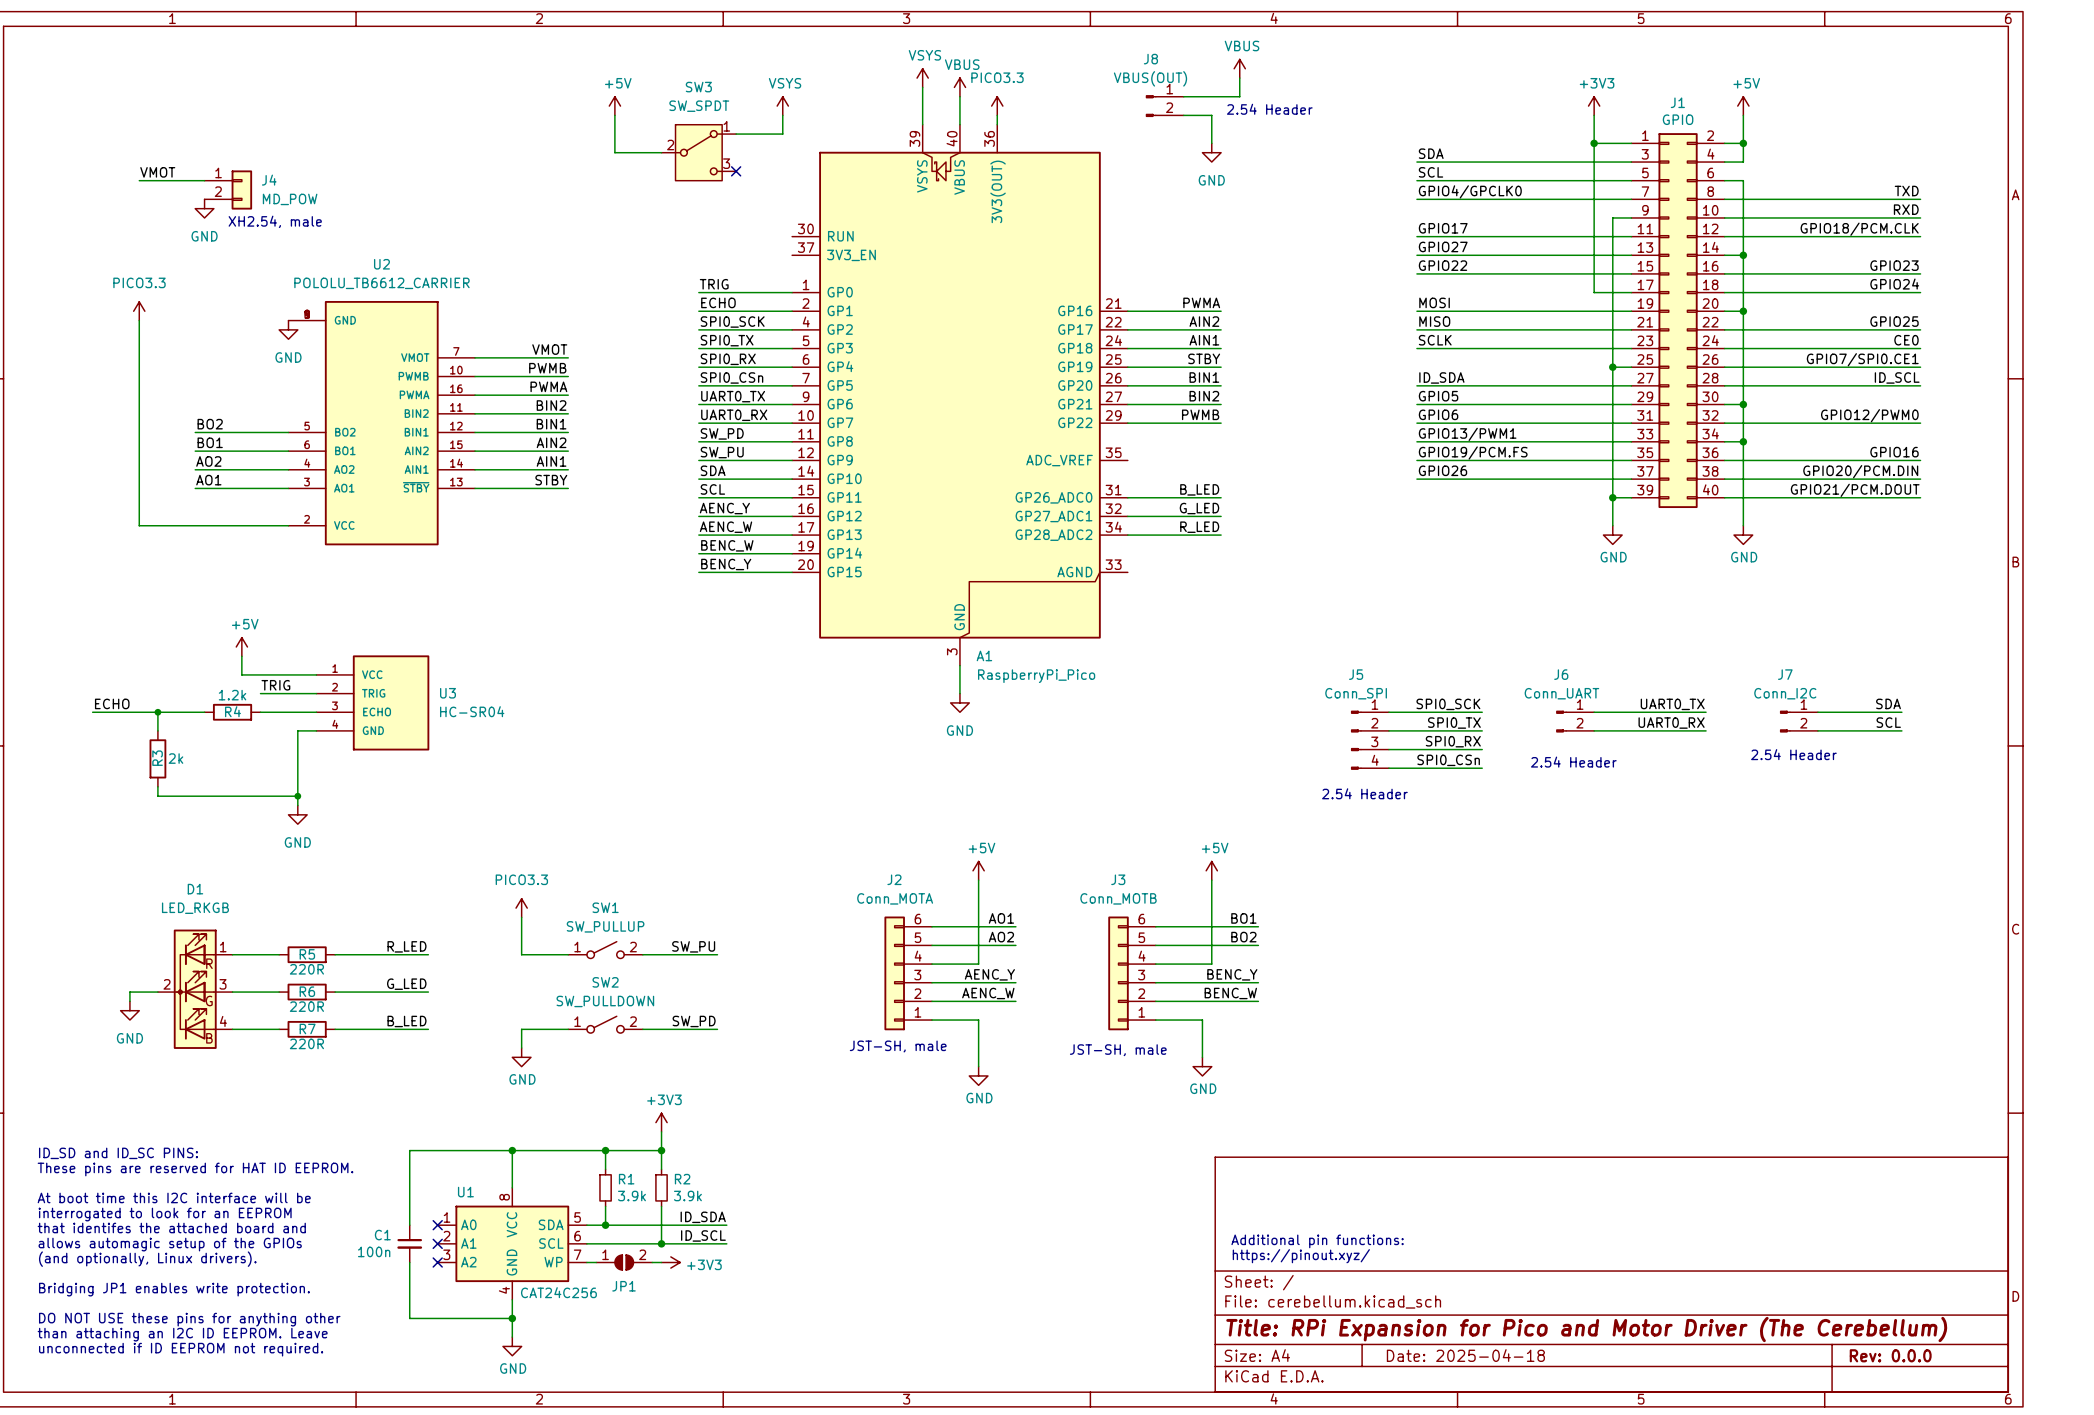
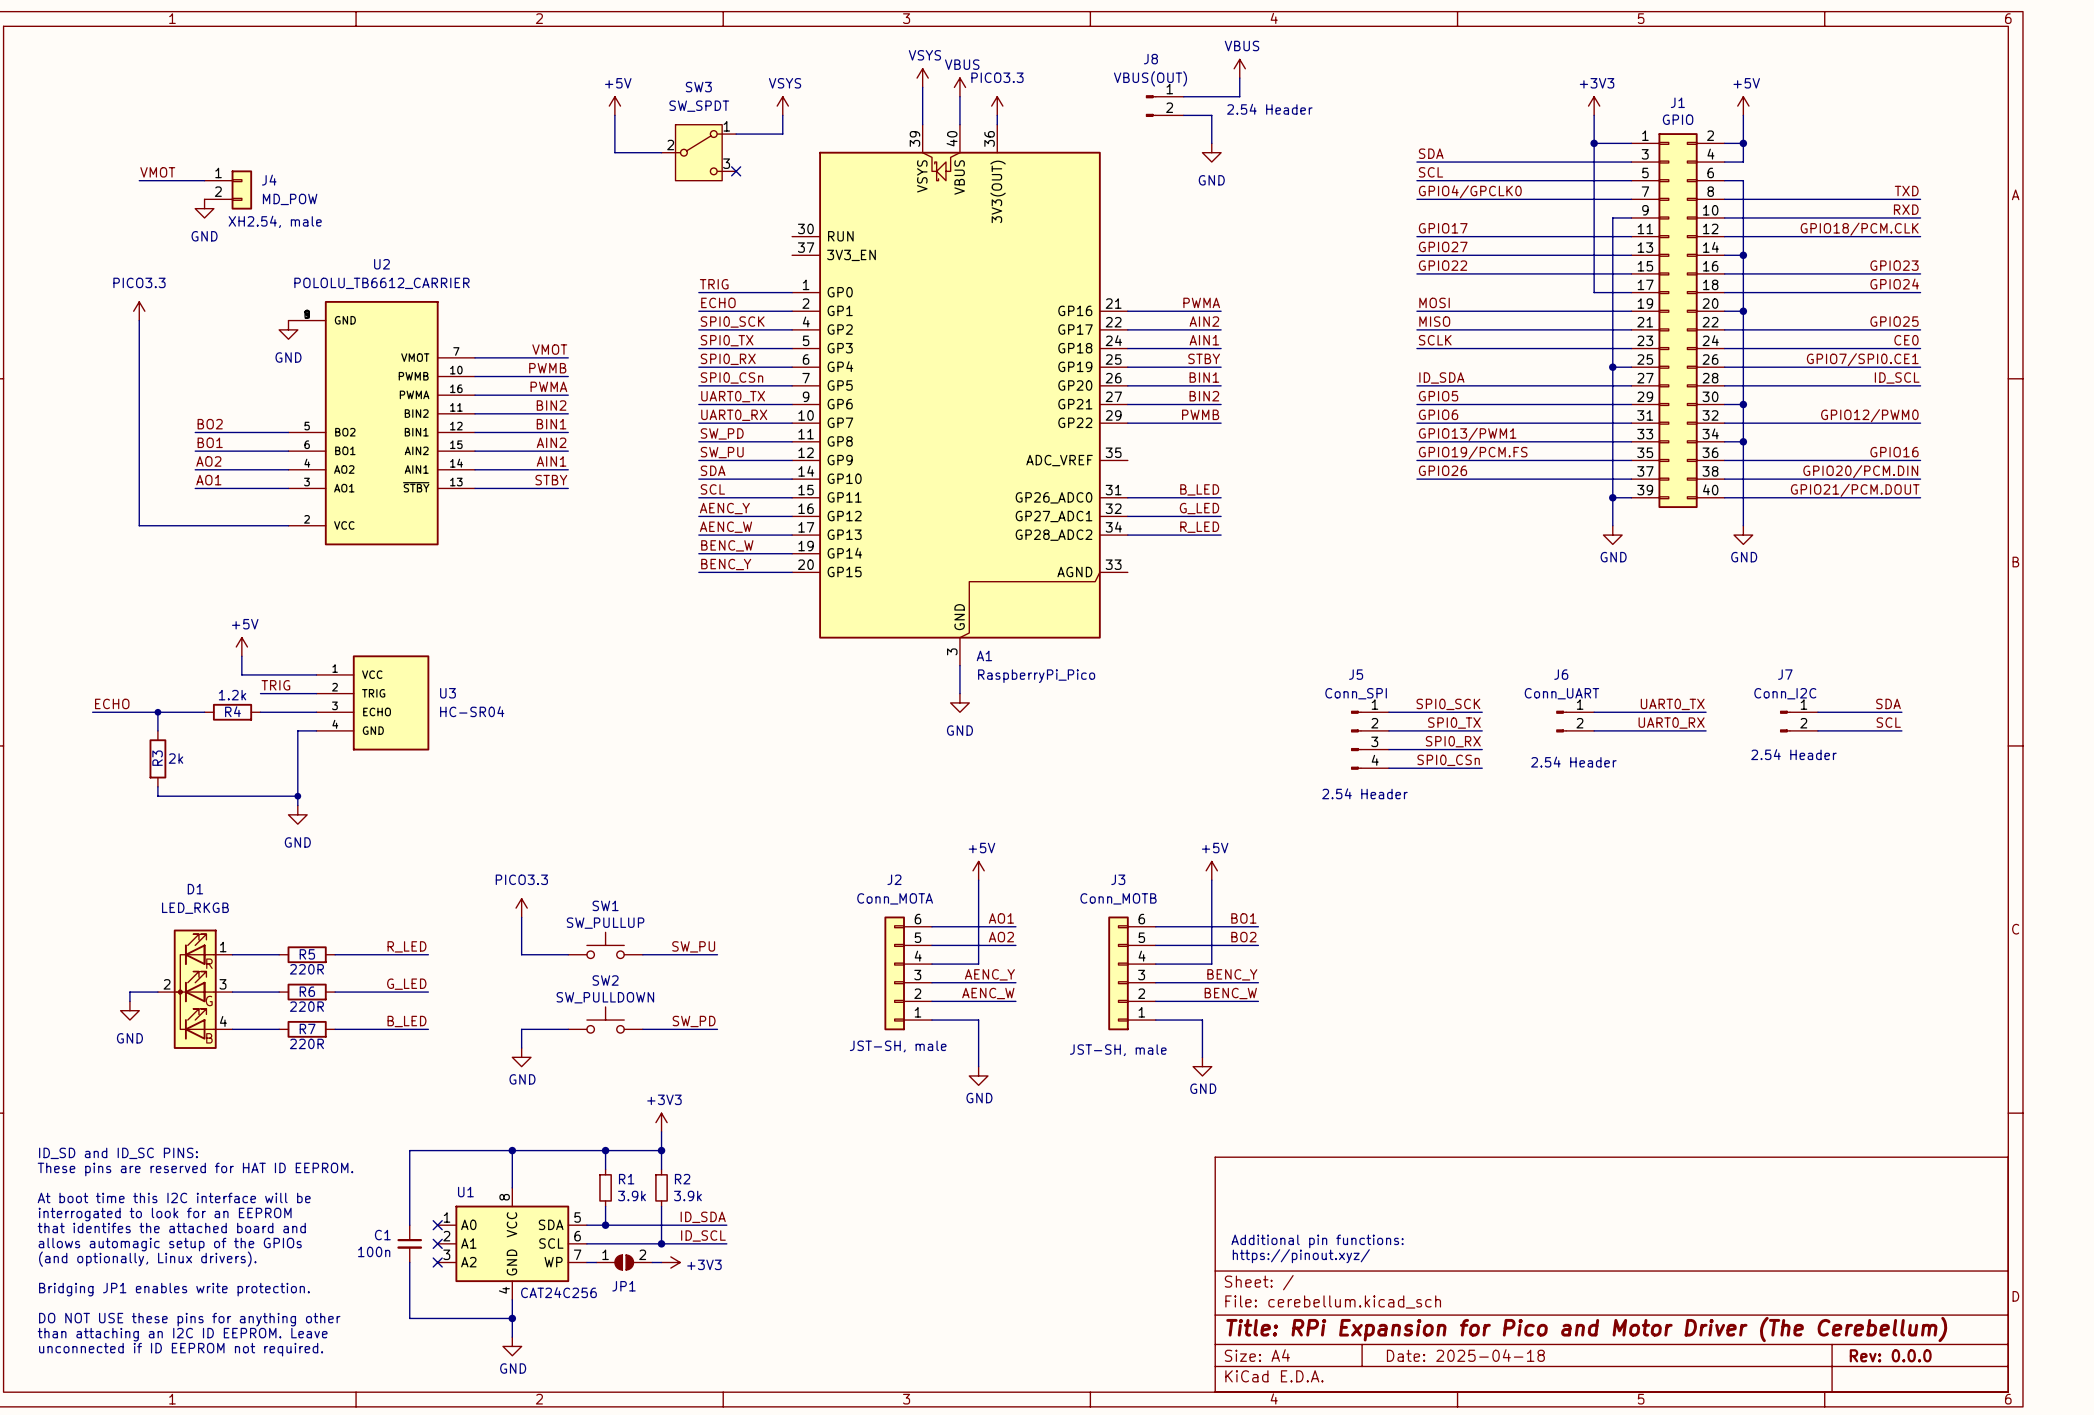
SW1 symbol: [568, 941, 643, 959] -> [568, 932, 643, 959]
SW2 symbol: [568, 1016, 643, 1034] -> [568, 1006, 643, 1034]

